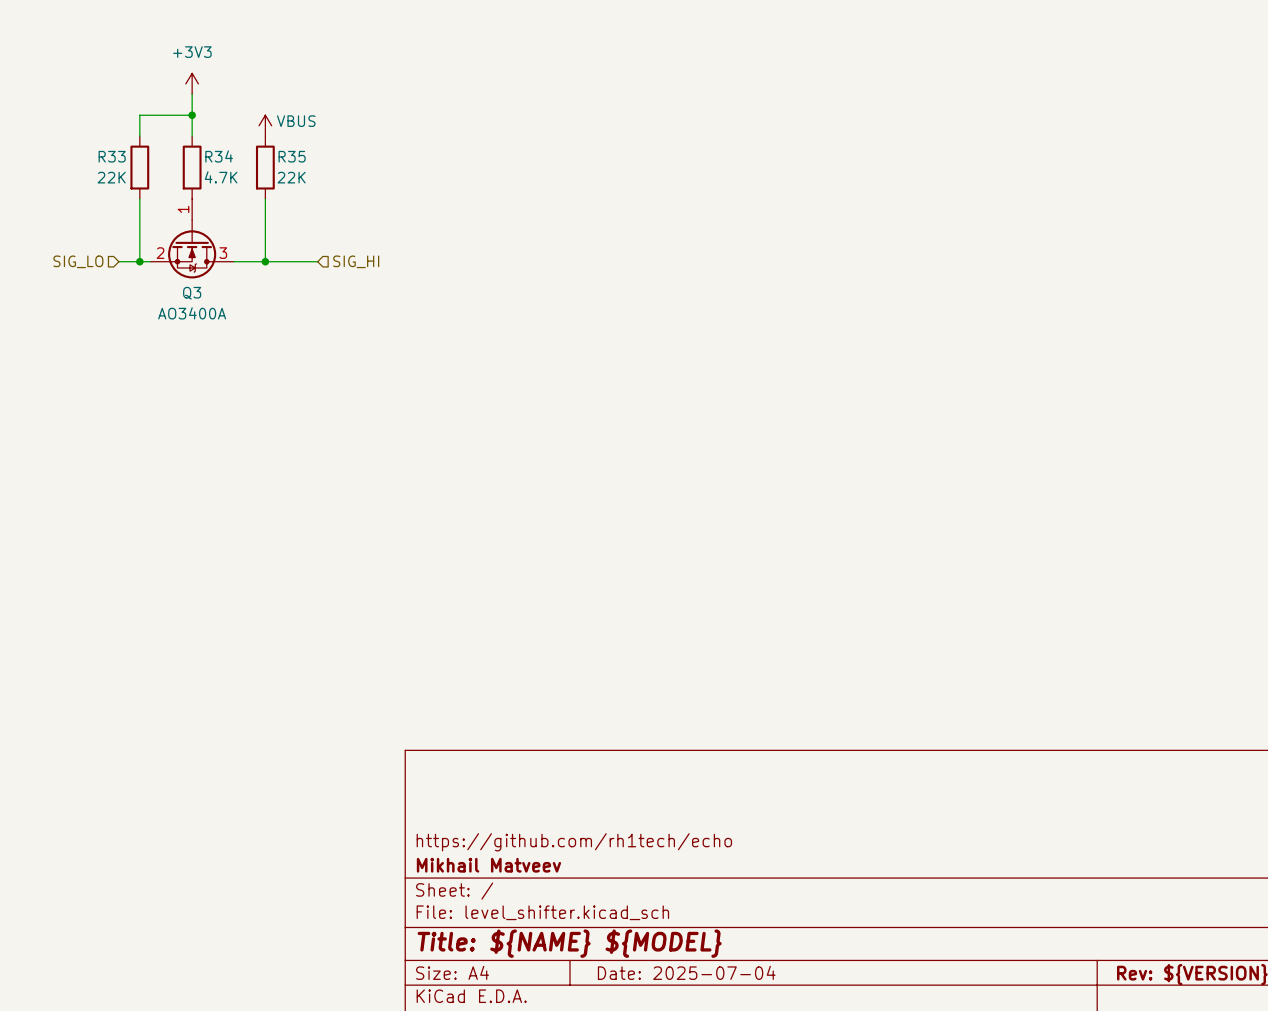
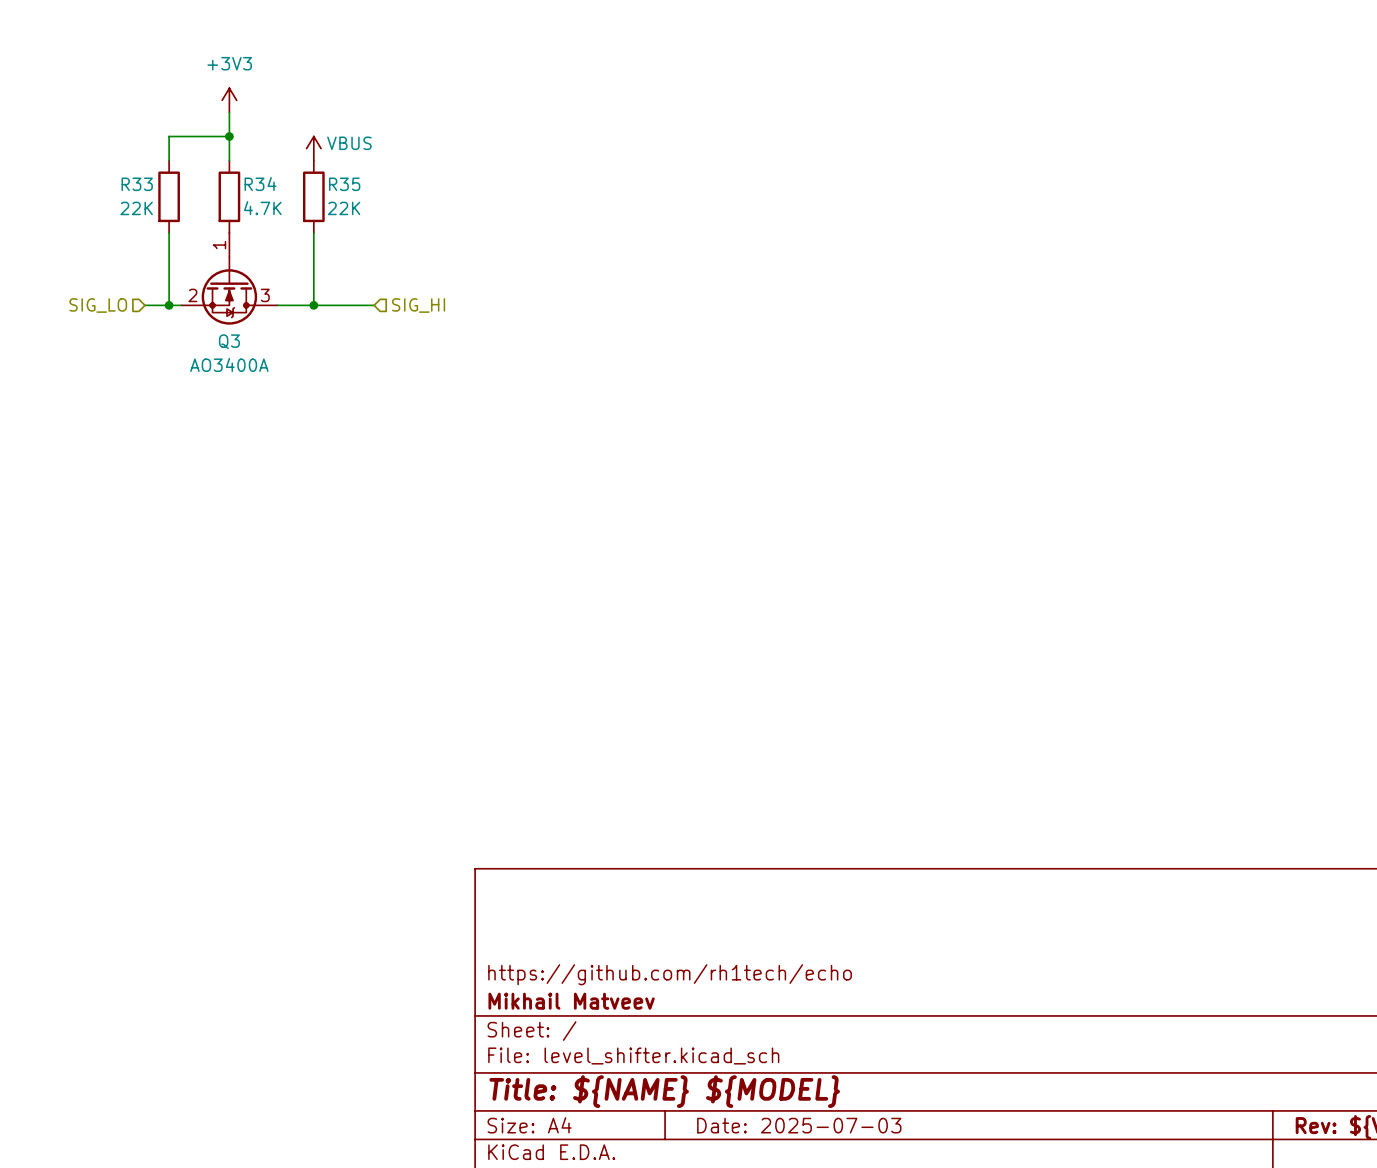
title block: Date: 2025-07-04 (686, 972) -> Date: 2025-07-03 (799, 1125)

